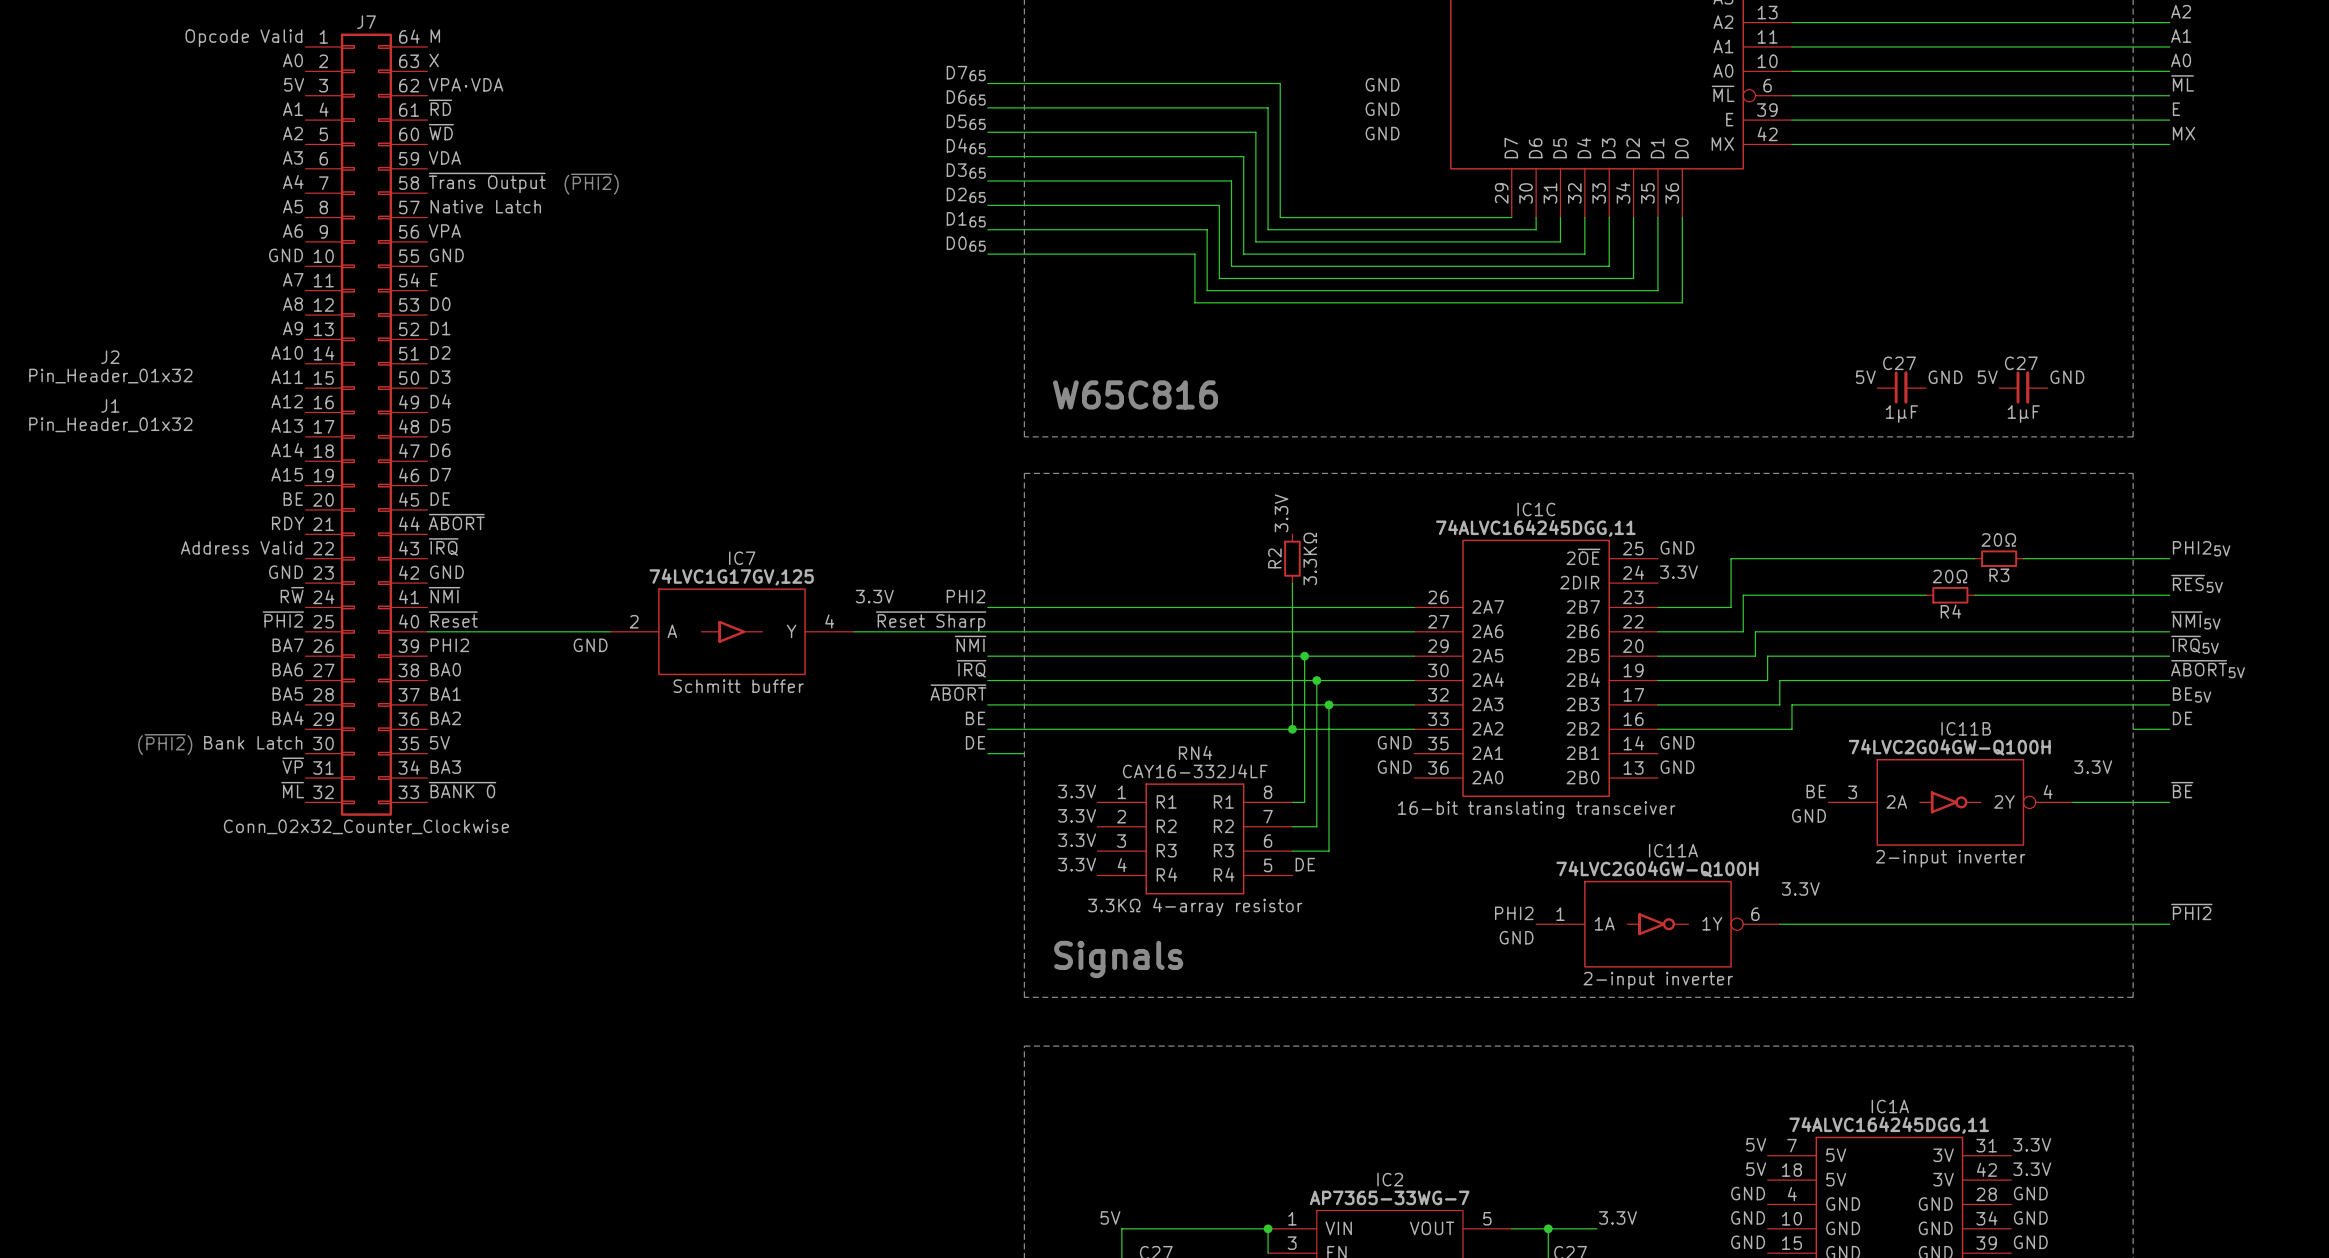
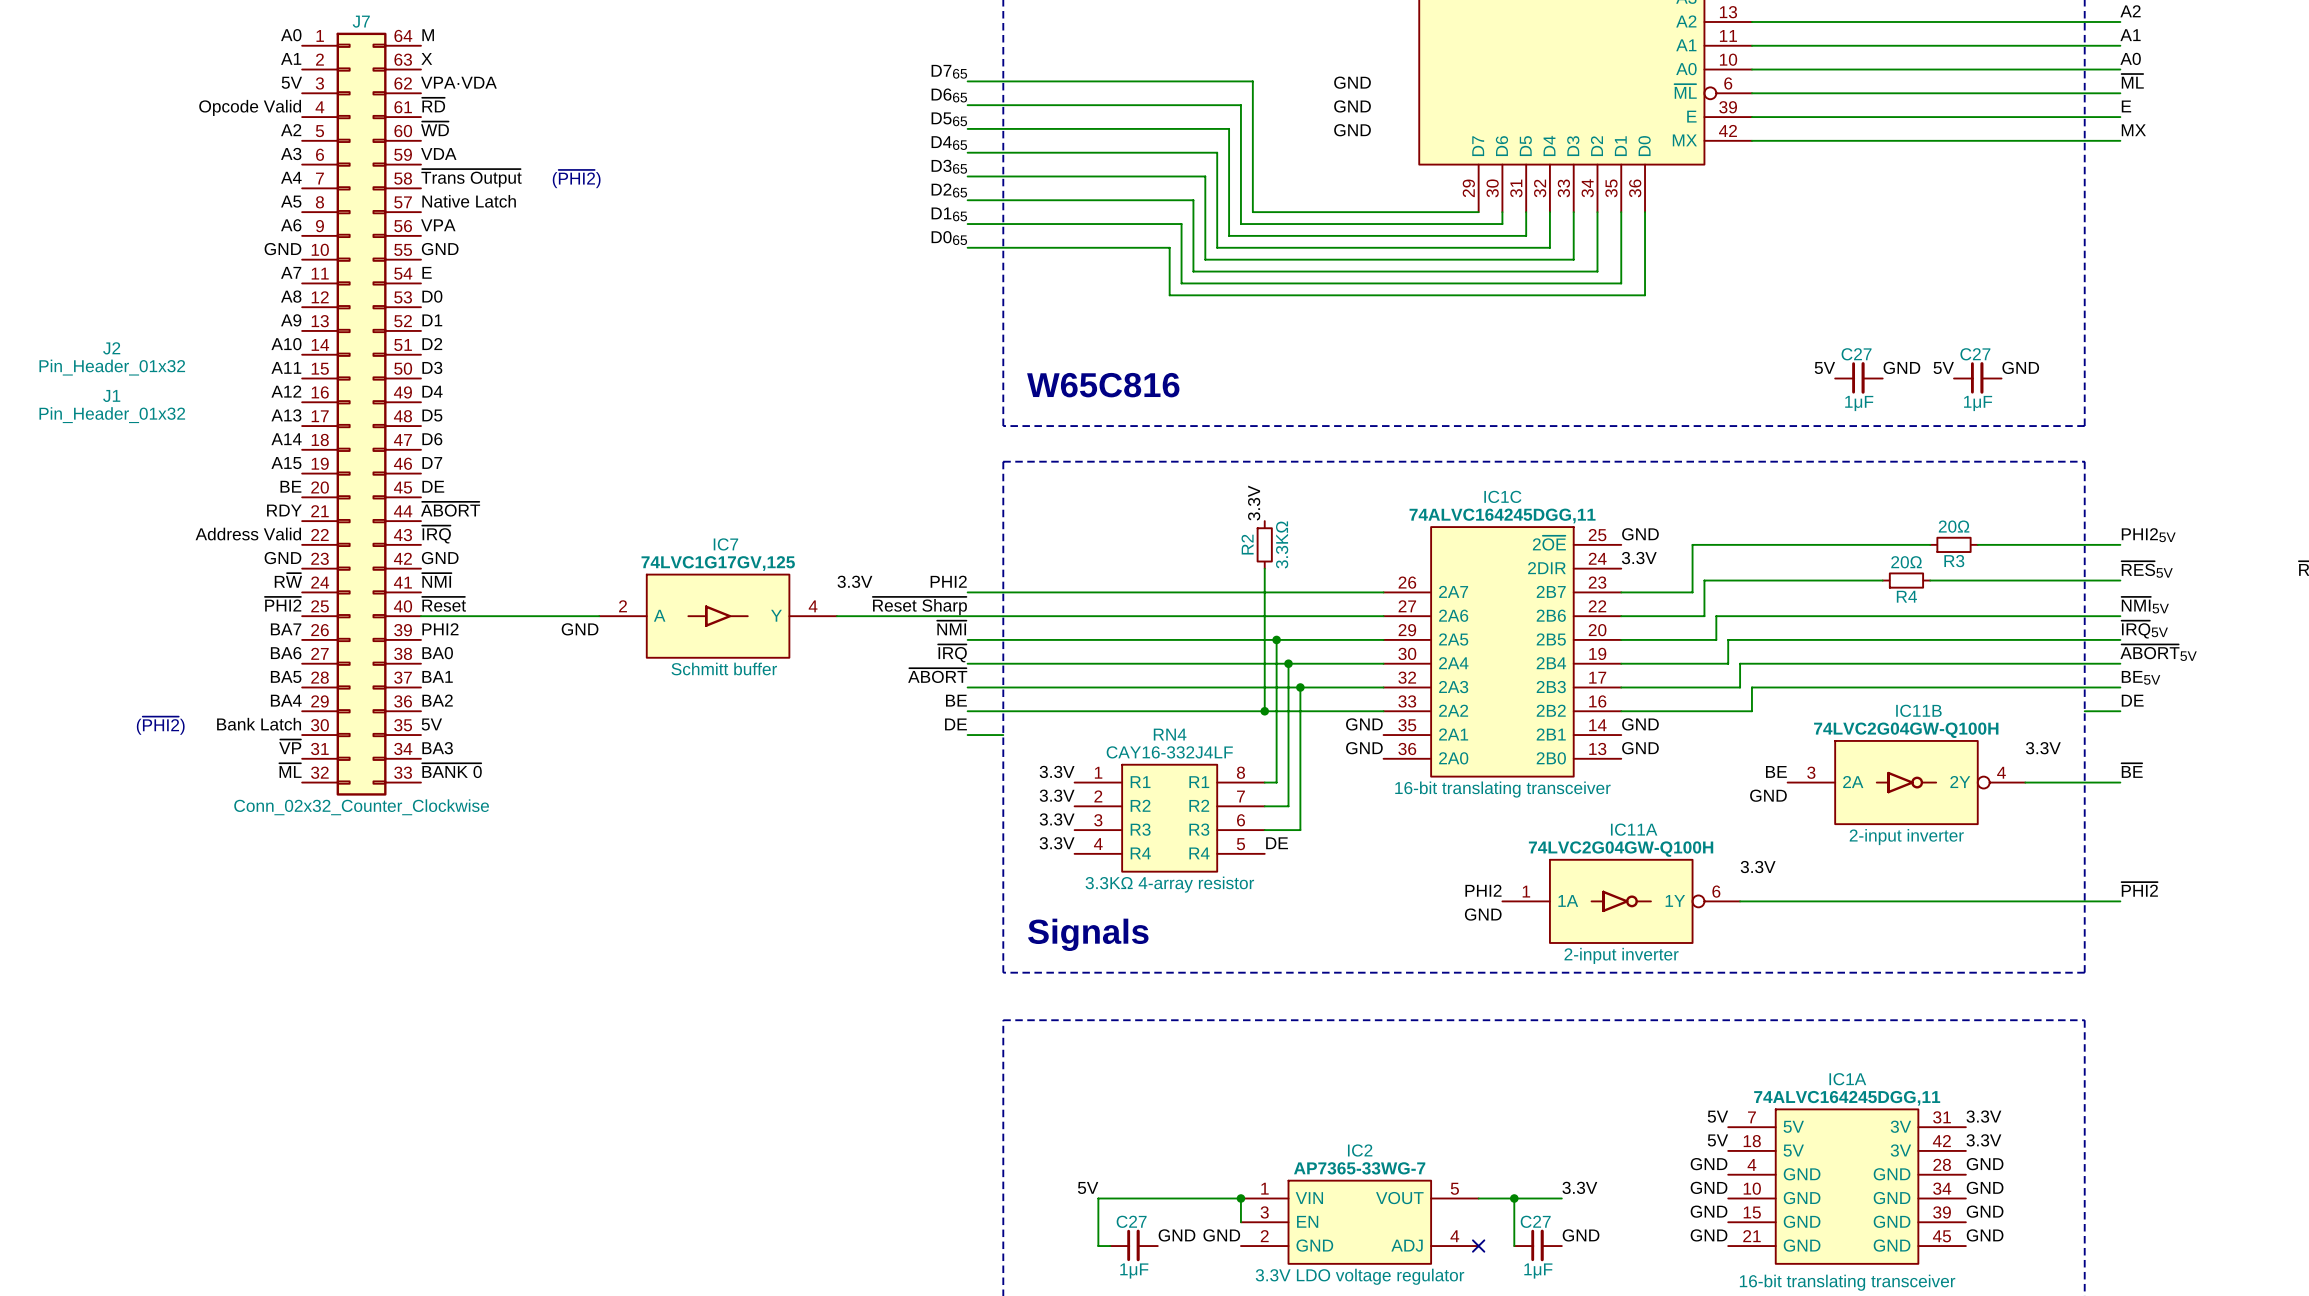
label: Opcode Valid (243, 38) -> A0 (291, 35)
label: A0 (292, 60) -> A1 (291, 58)
label: A1 (292, 109) -> Opcode Valid (250, 107)

